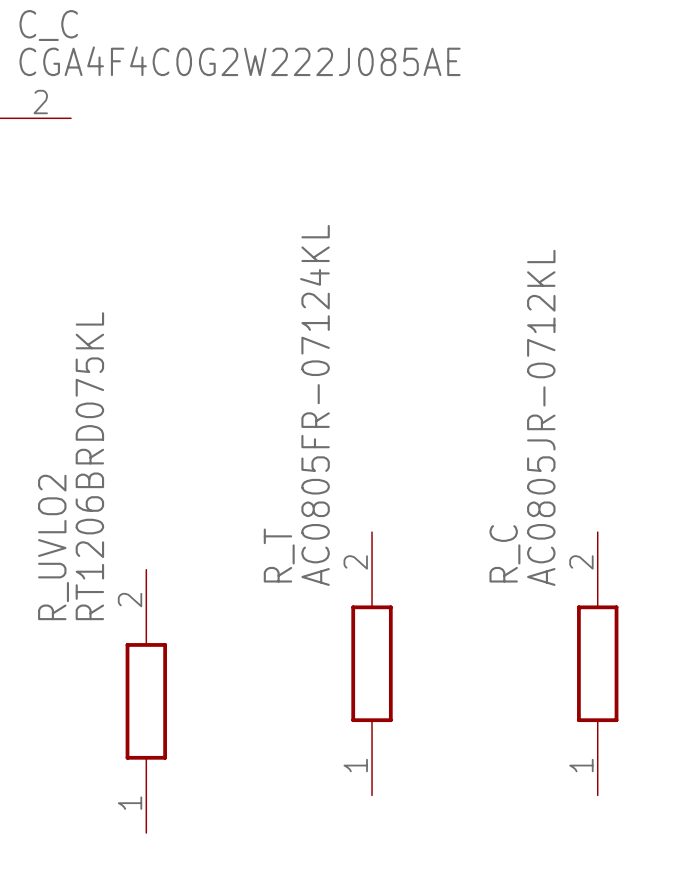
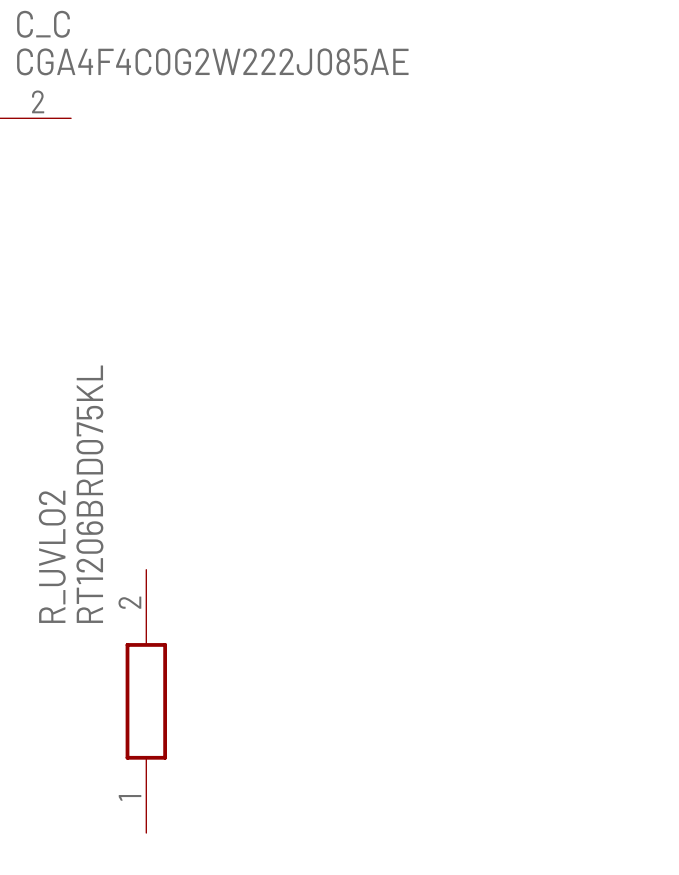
R_T: AC0805FR-07124KL (372, 663) -> none
R_C: AC0805JR-0712KL (597, 663) -> none

